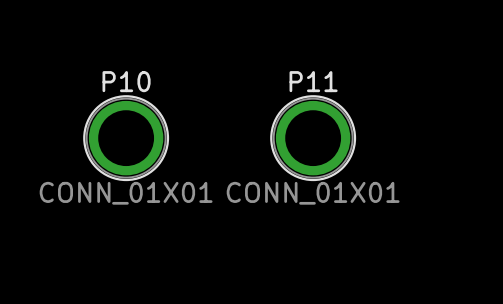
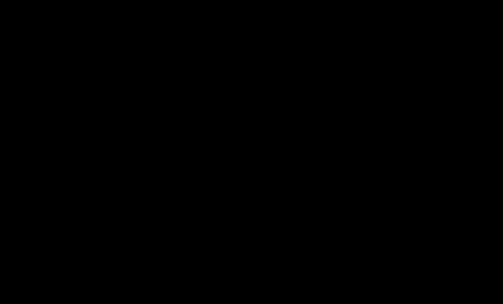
P10: CONN_01X01 (126, 138) -> none
P11: CONN_01X01 (313, 138) -> none

